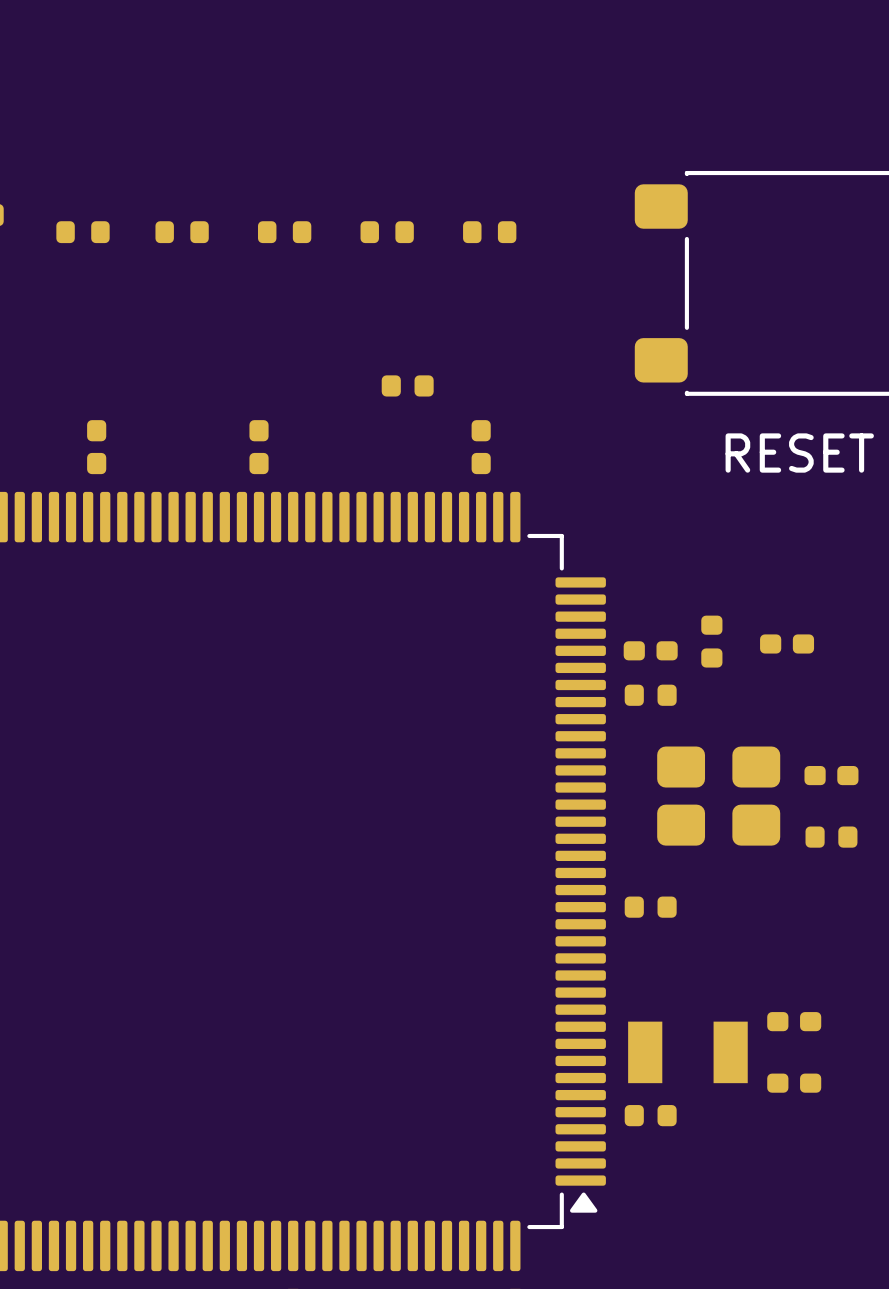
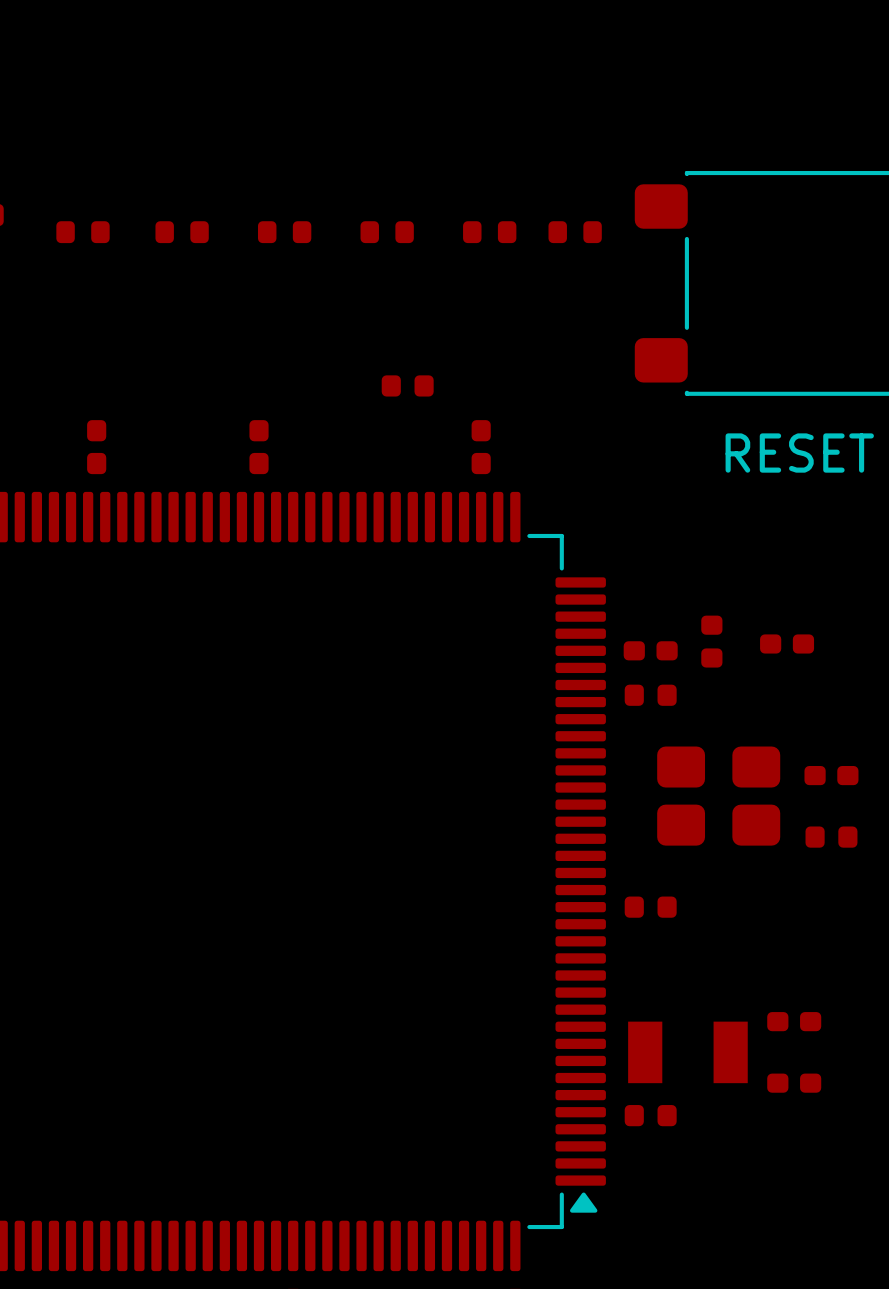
part: none -> (575, 232)

